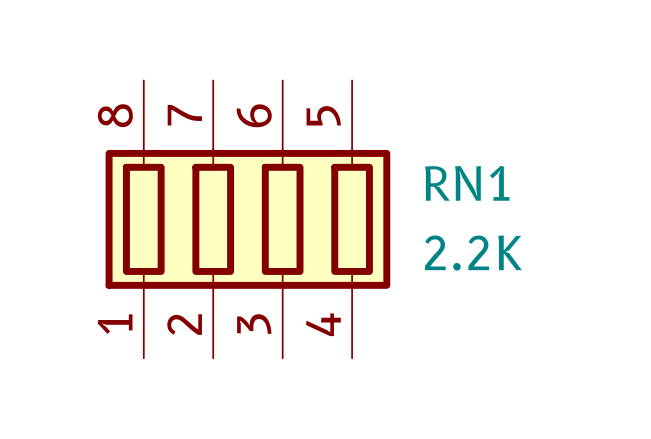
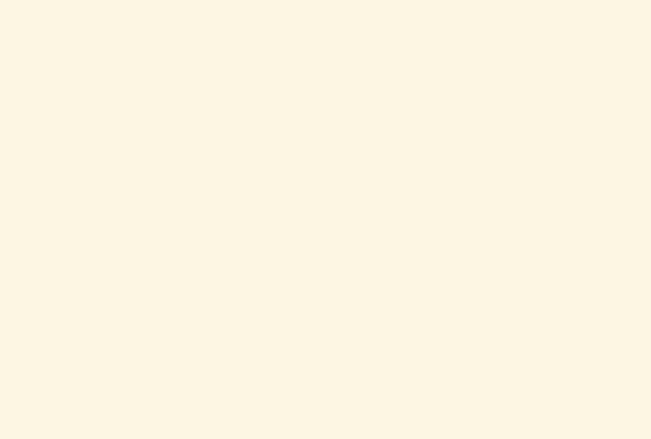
RN1: 2.2K (247, 219) -> none

